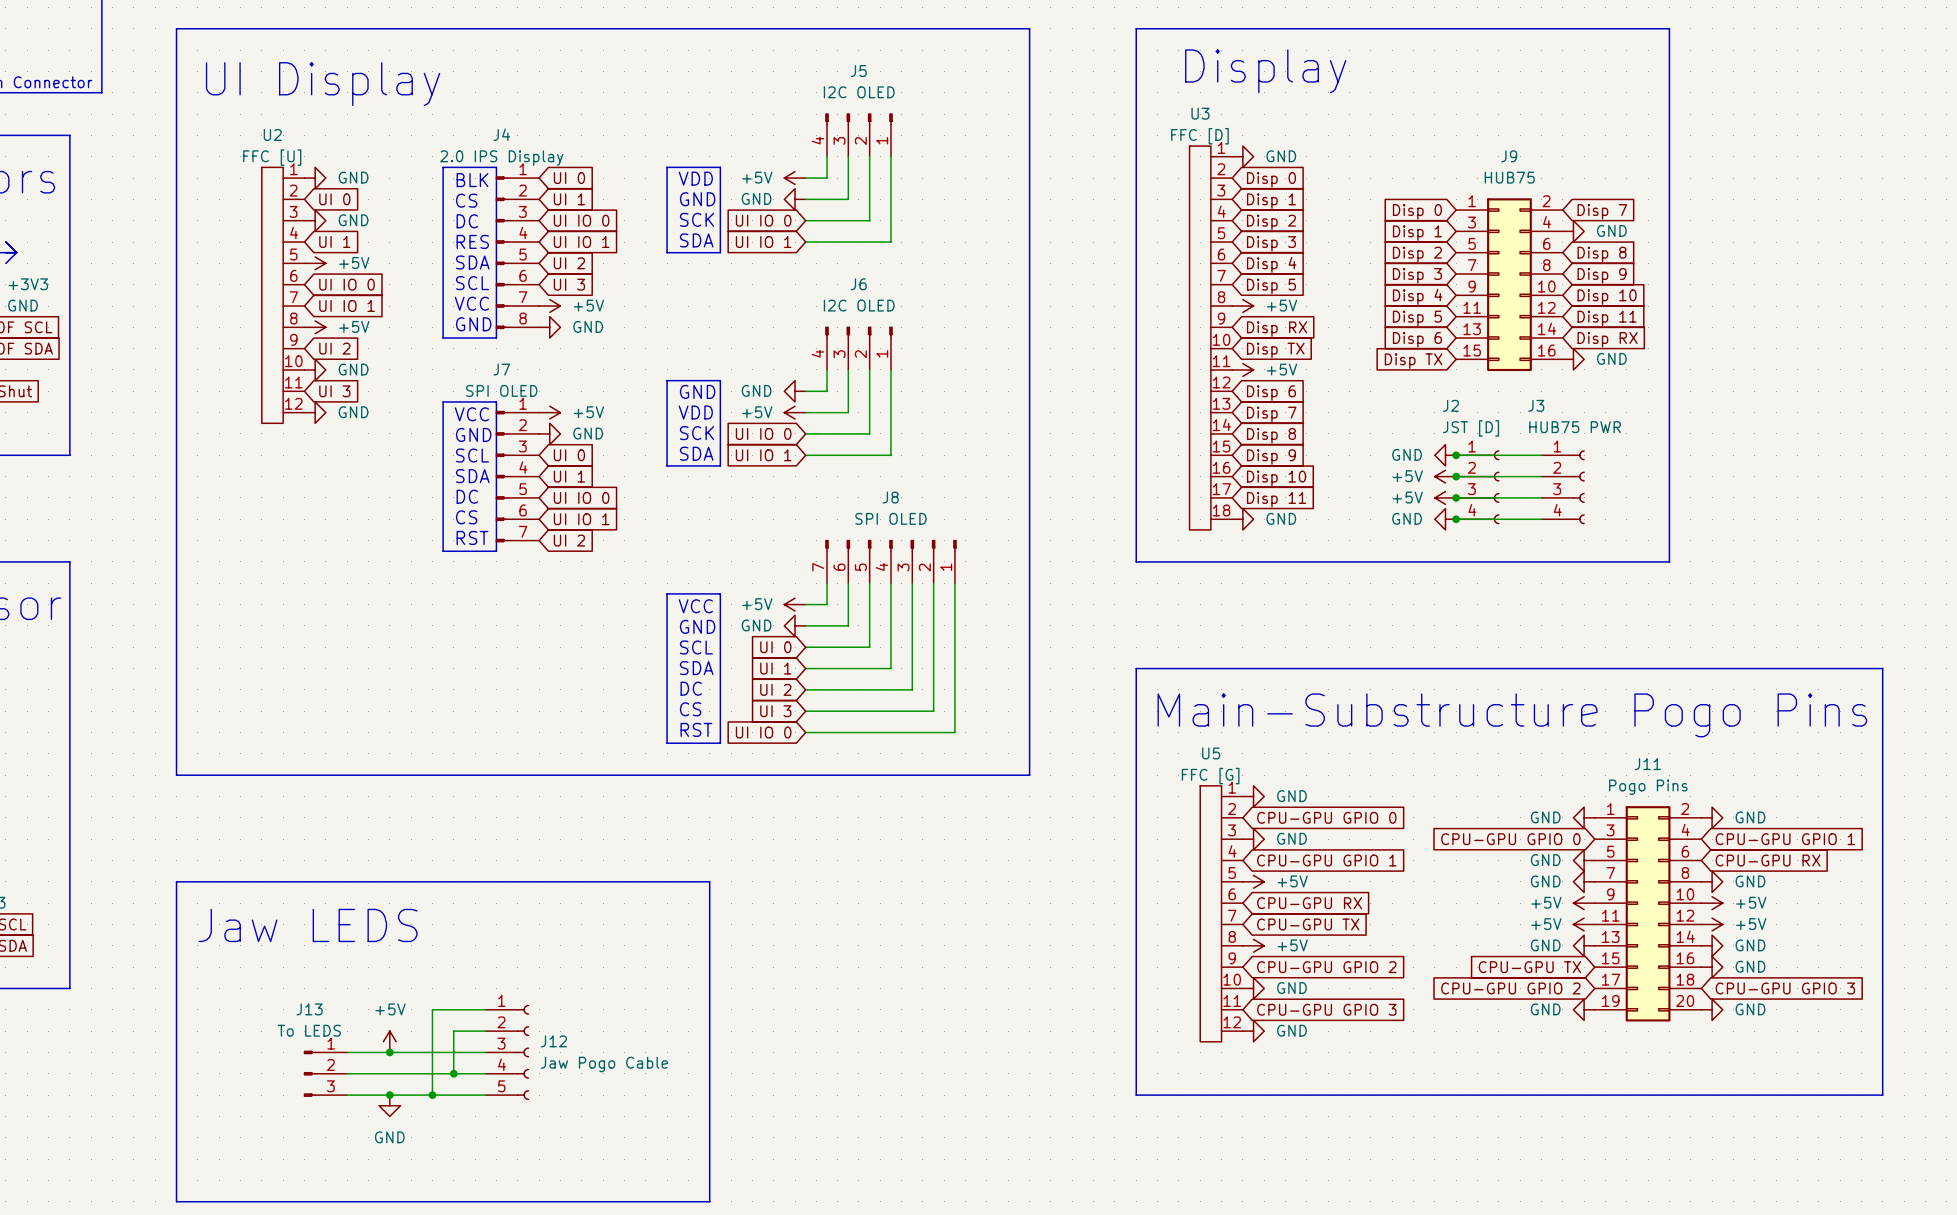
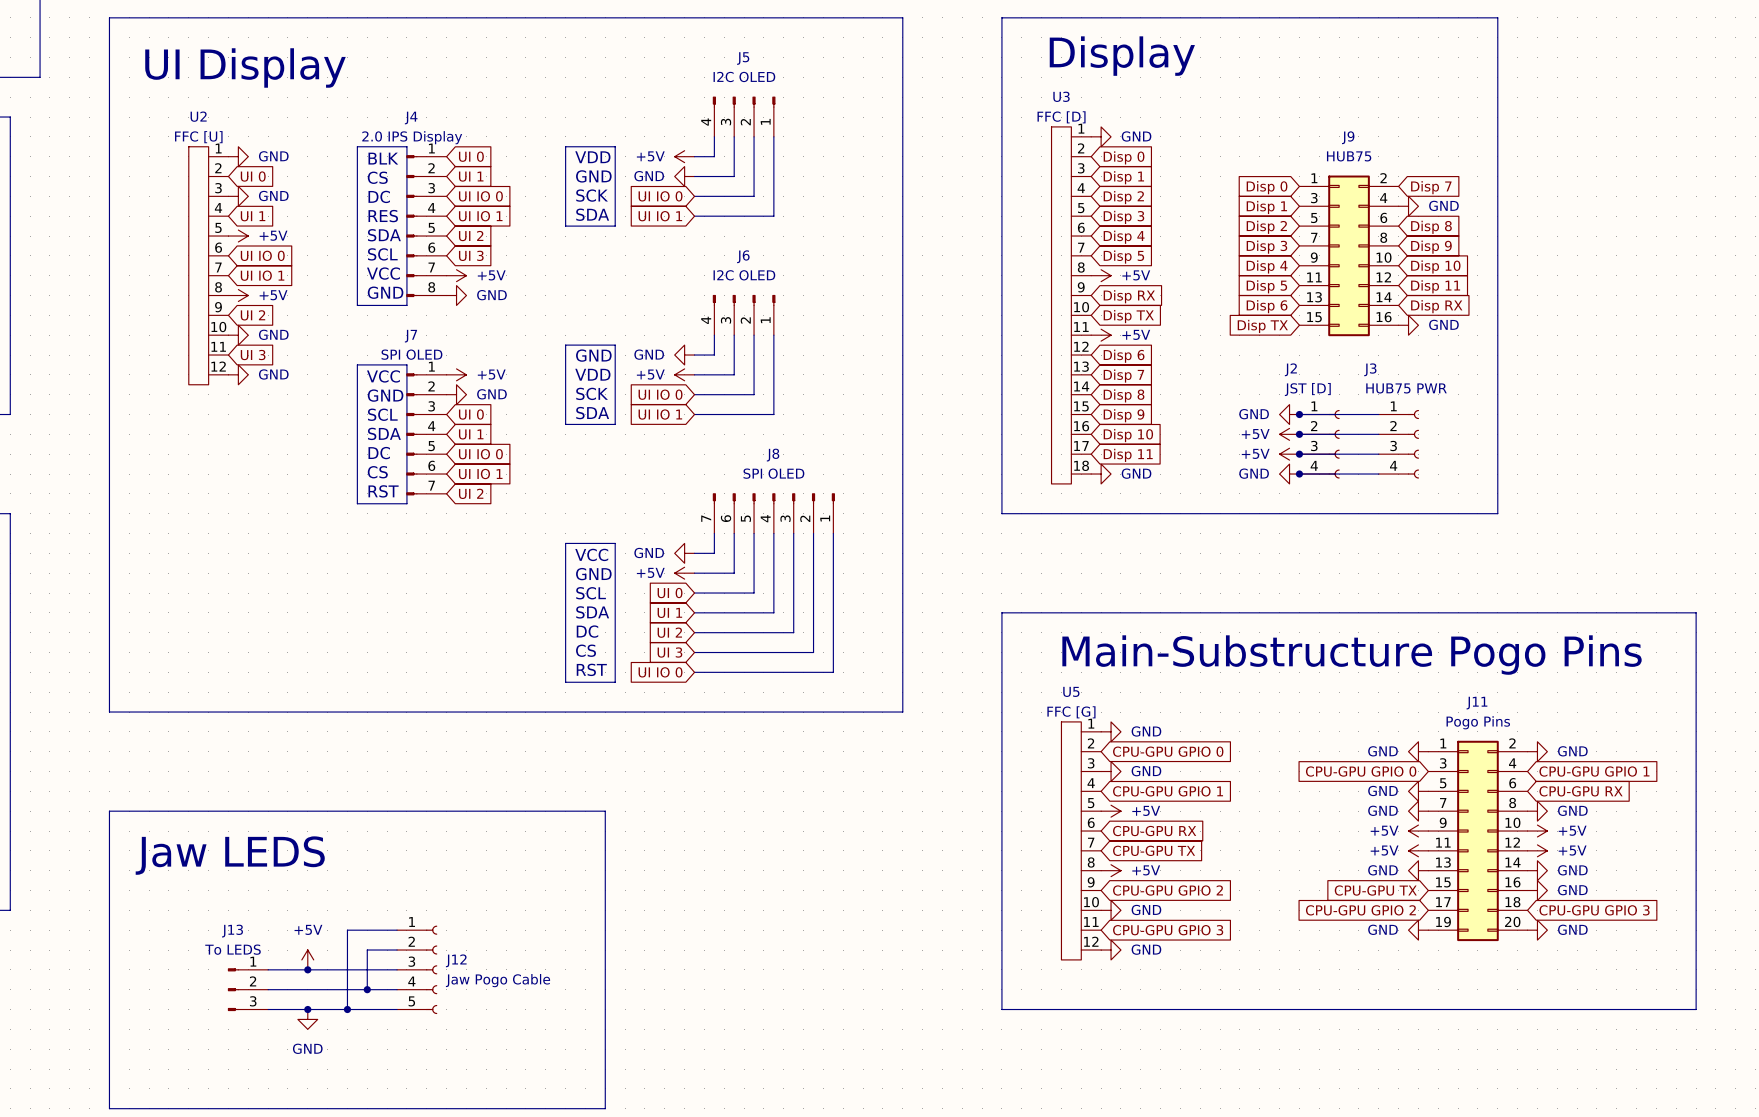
power symbol: +5V (795, 604) -> GND (684, 553)
power symbol: GND (795, 625) -> +5V (684, 573)

